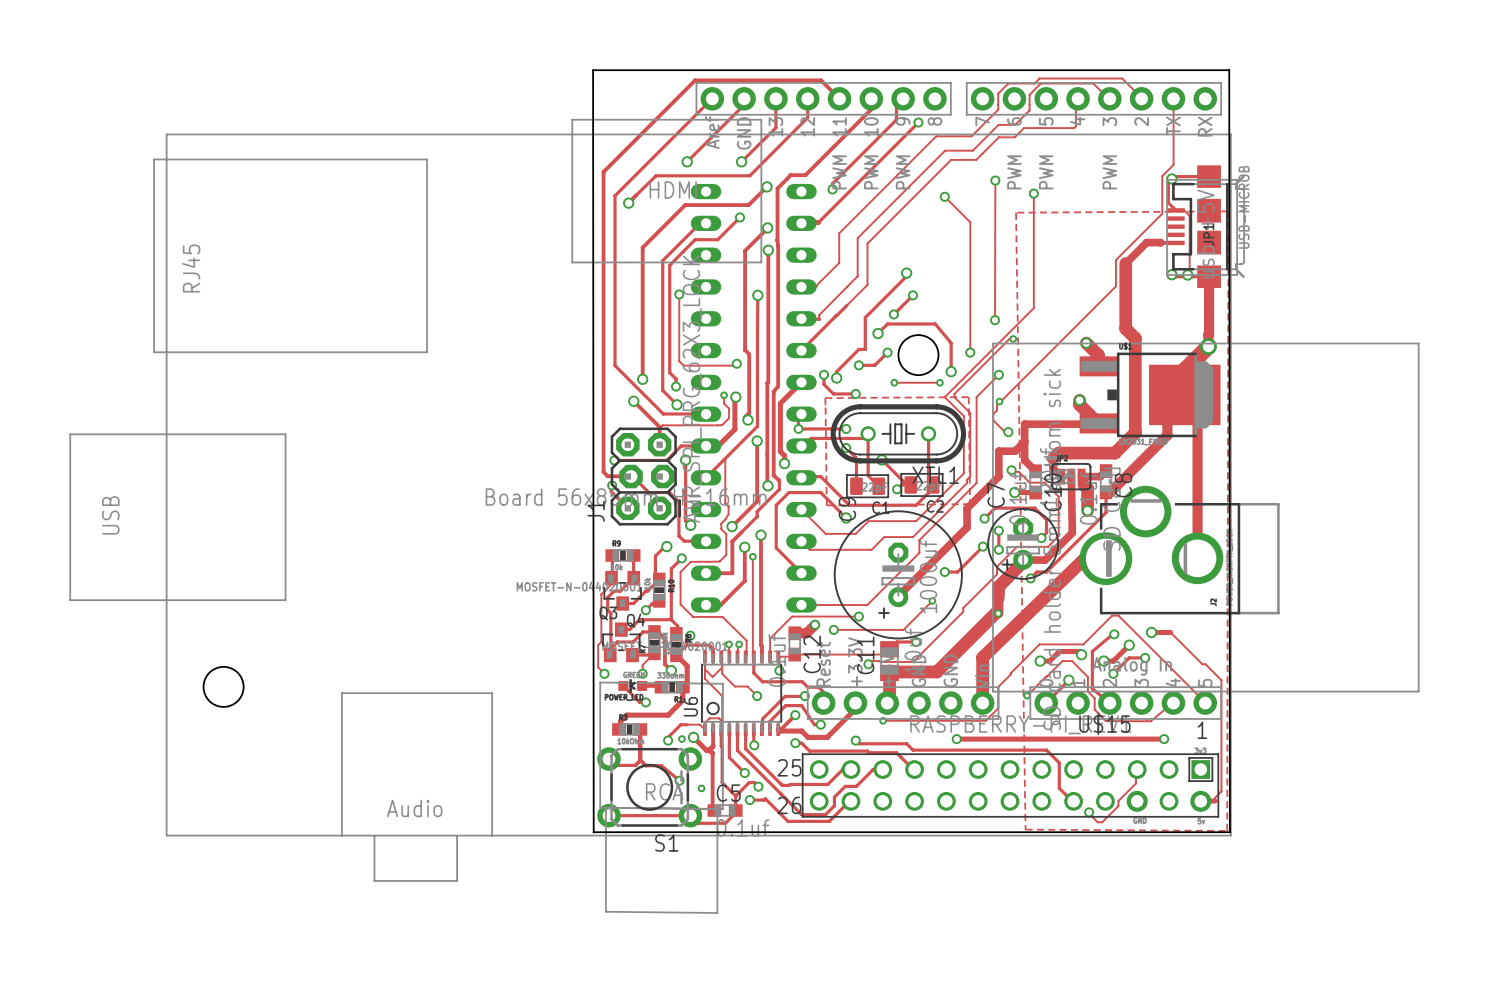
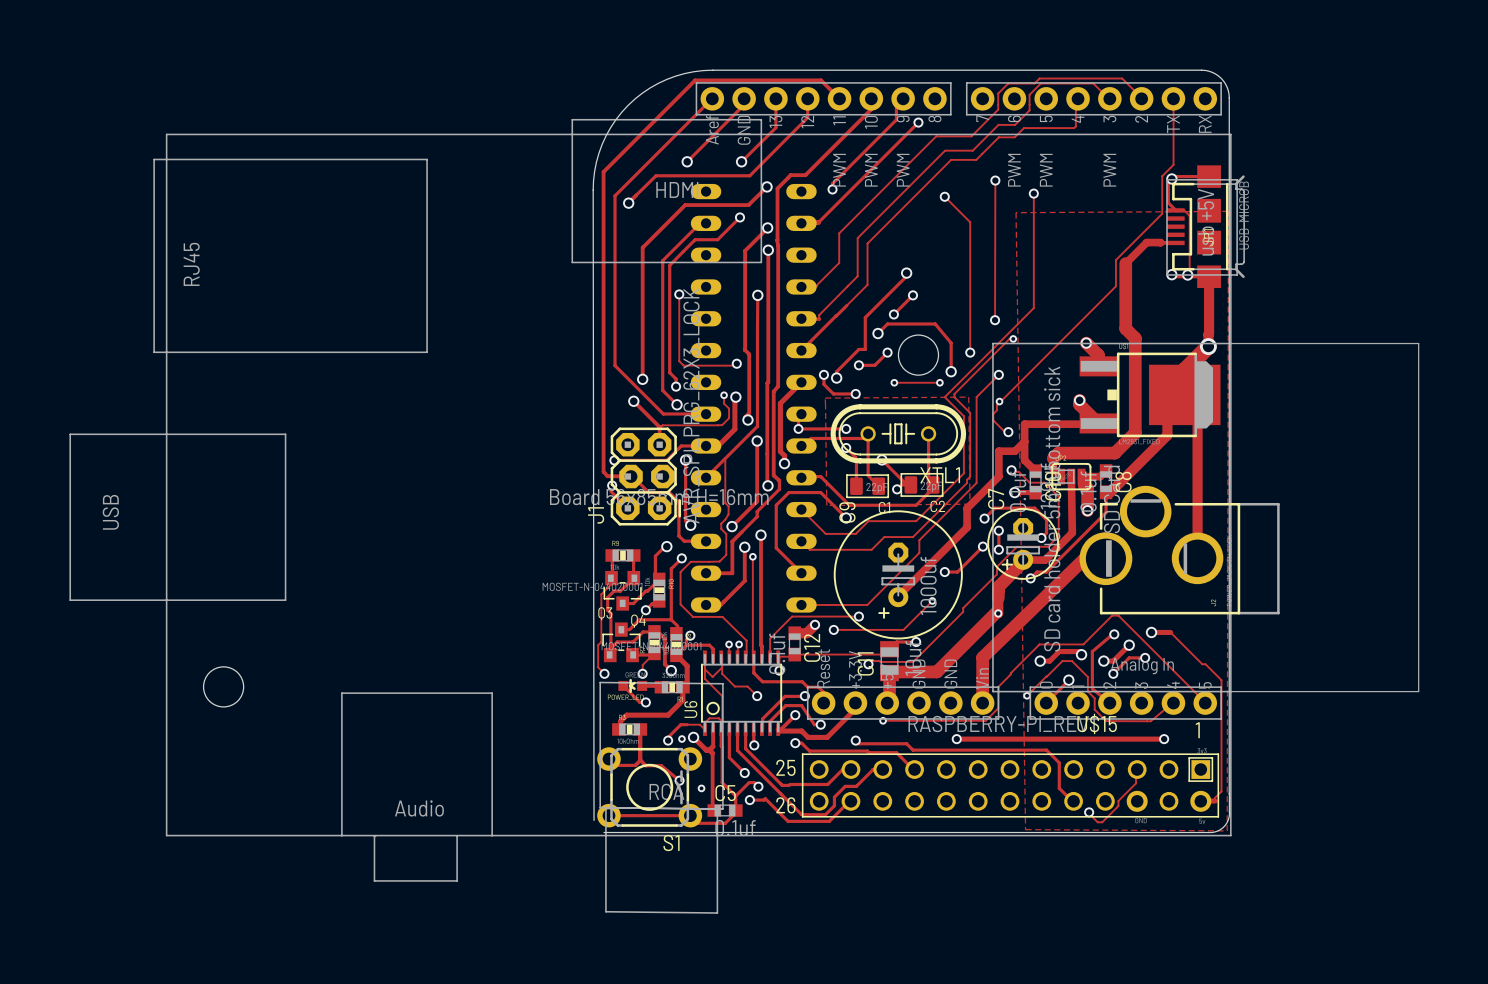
board edge: (712, 70) (593, 70) (593, 832) -> (712, 70) (675, 76) (658, 83) (635, 98) (615, 119) (606, 135) (594, 171) (594, 820)
board edge: (1201, 70) (1229, 70) (1230, 832) (593, 832) -> (1201, 70) (1212, 72) (1221, 78) (1227, 87) (1229, 97) (1229, 794)
board edge: none -> (1229, 793) (1227, 821) (1221, 829) (1211, 832) (604, 832)

